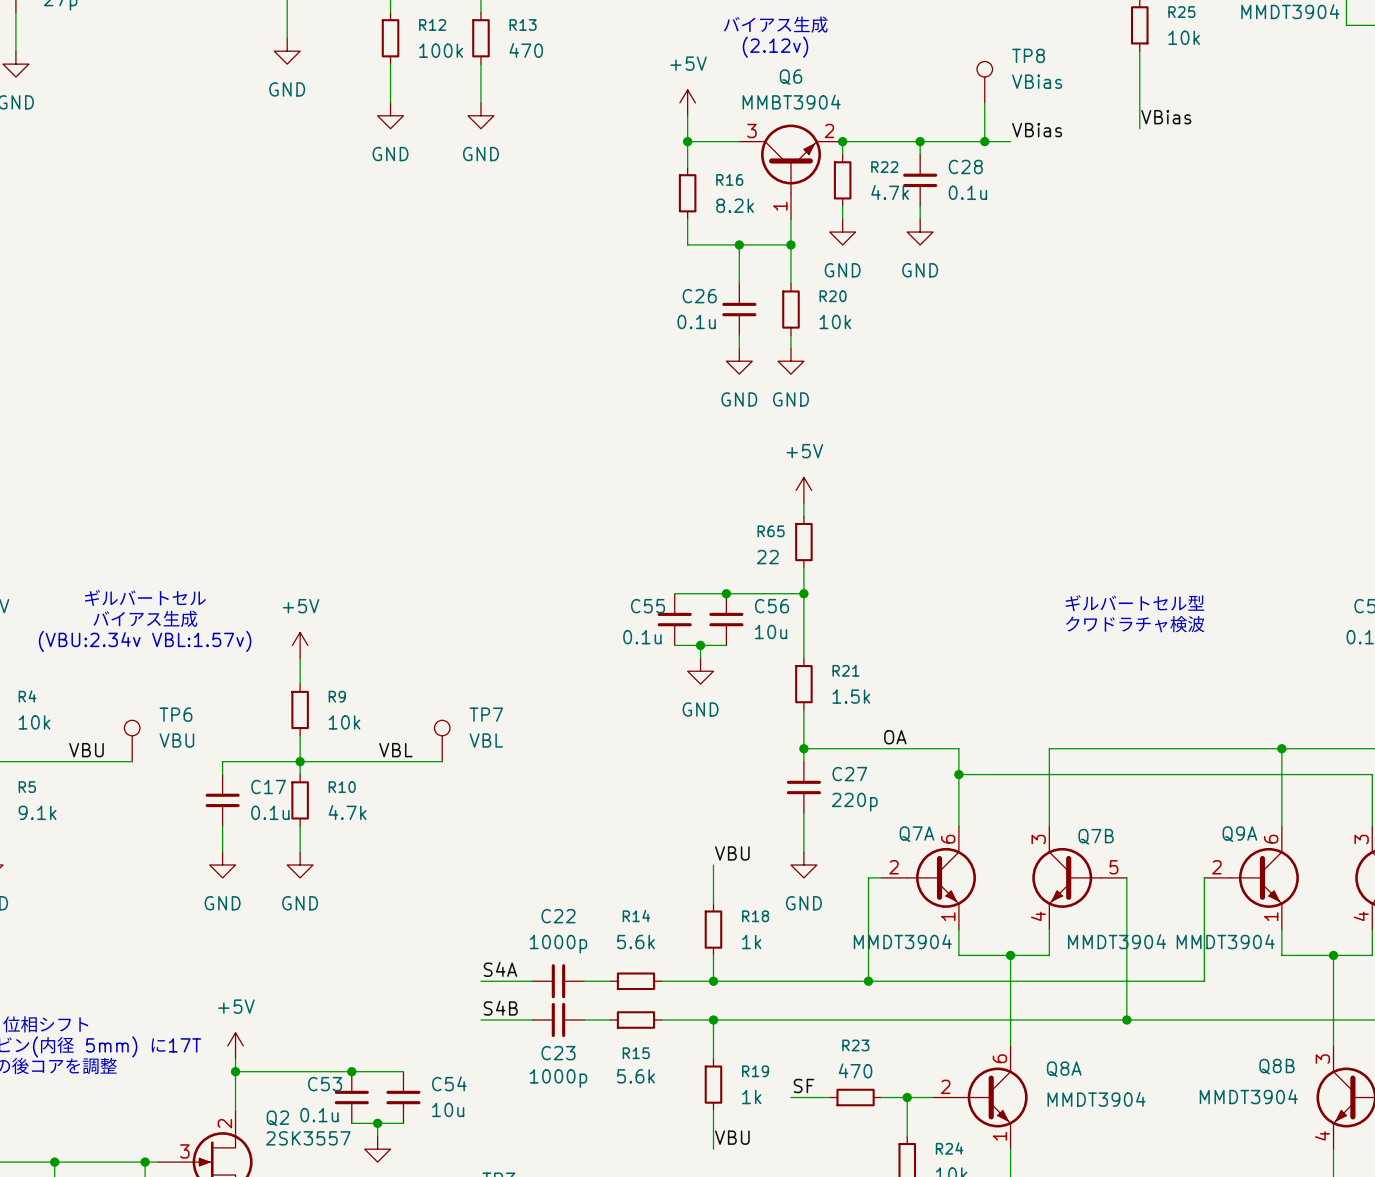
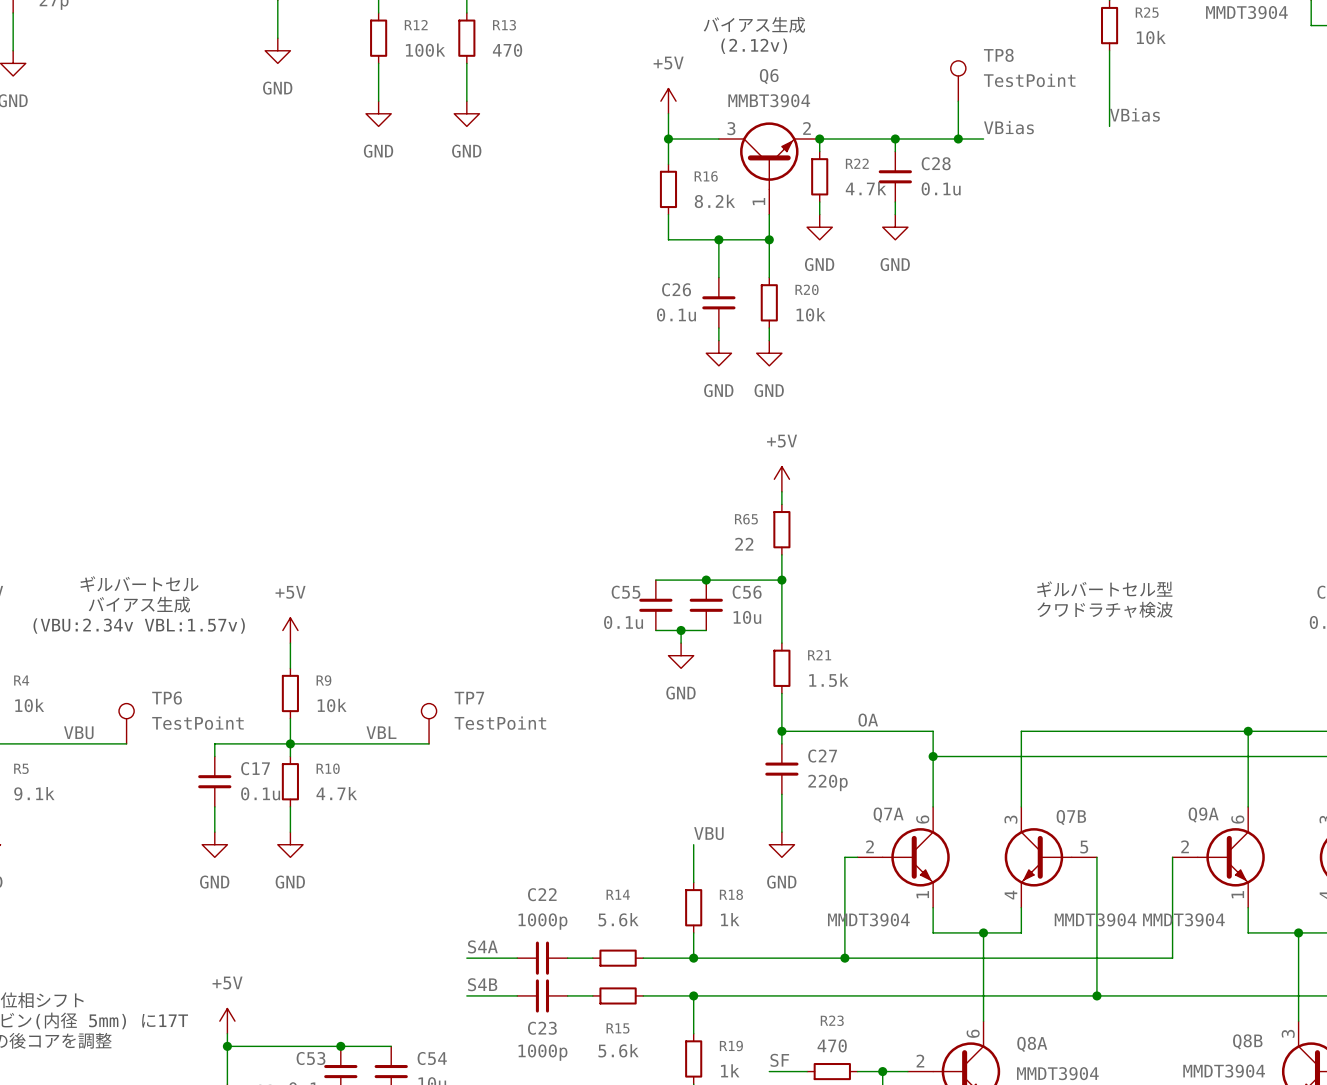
TP8 value: VBias (1037, 81) -> TestPoint (1029, 80)
TP6 value: VBU (176, 740) -> TestPoint (197, 723)
TP7 value: VBL (486, 740) -> TestPoint (500, 723)

